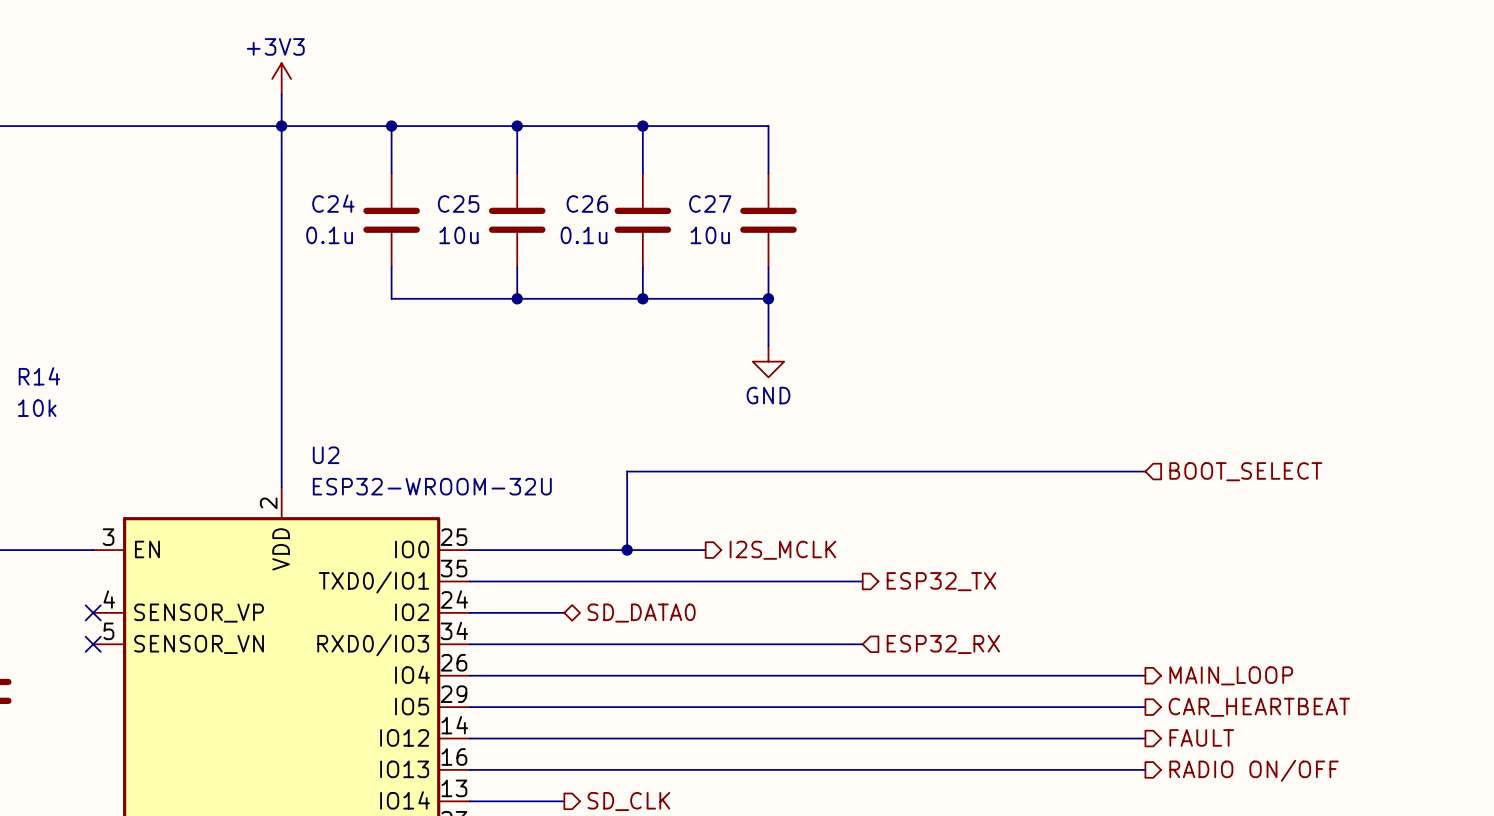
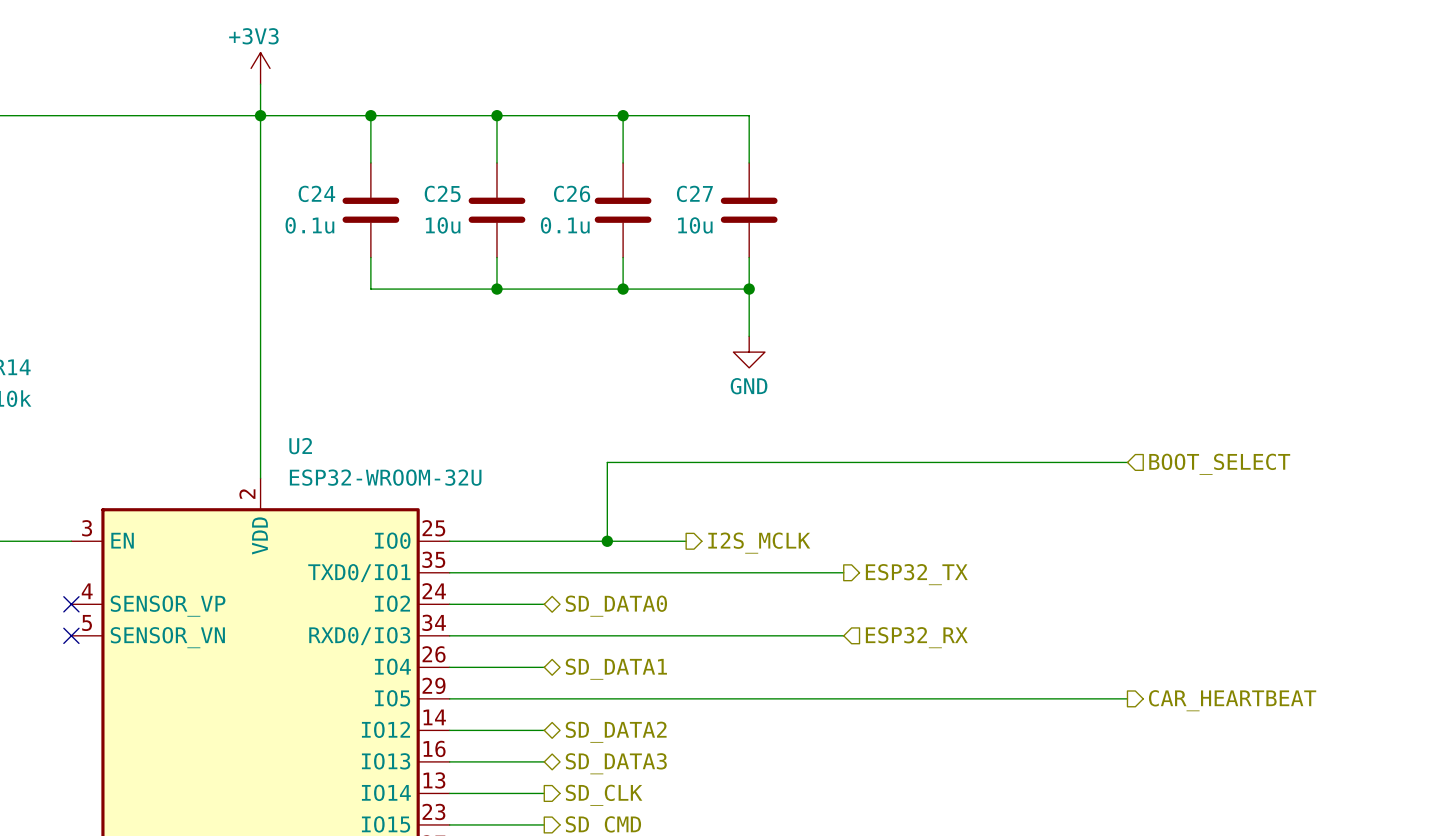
wire: (564, 675) (1145, 675) -> none
hierarchical label: none -> SD_DATA1 (616, 669)
hierarchical label: MAIN_LOOP (1231, 675) -> none
hierarchical label: FAULT (1201, 737) -> none
wire: (564, 738) (1145, 738) -> none
hierarchical label: none -> SD_DATA2 (616, 732)
wire: (564, 769) (1145, 769) -> none
hierarchical label: none -> SD_DATA3 (616, 763)
hierarchical label: RADIO ON/OFF (1254, 770) -> none

